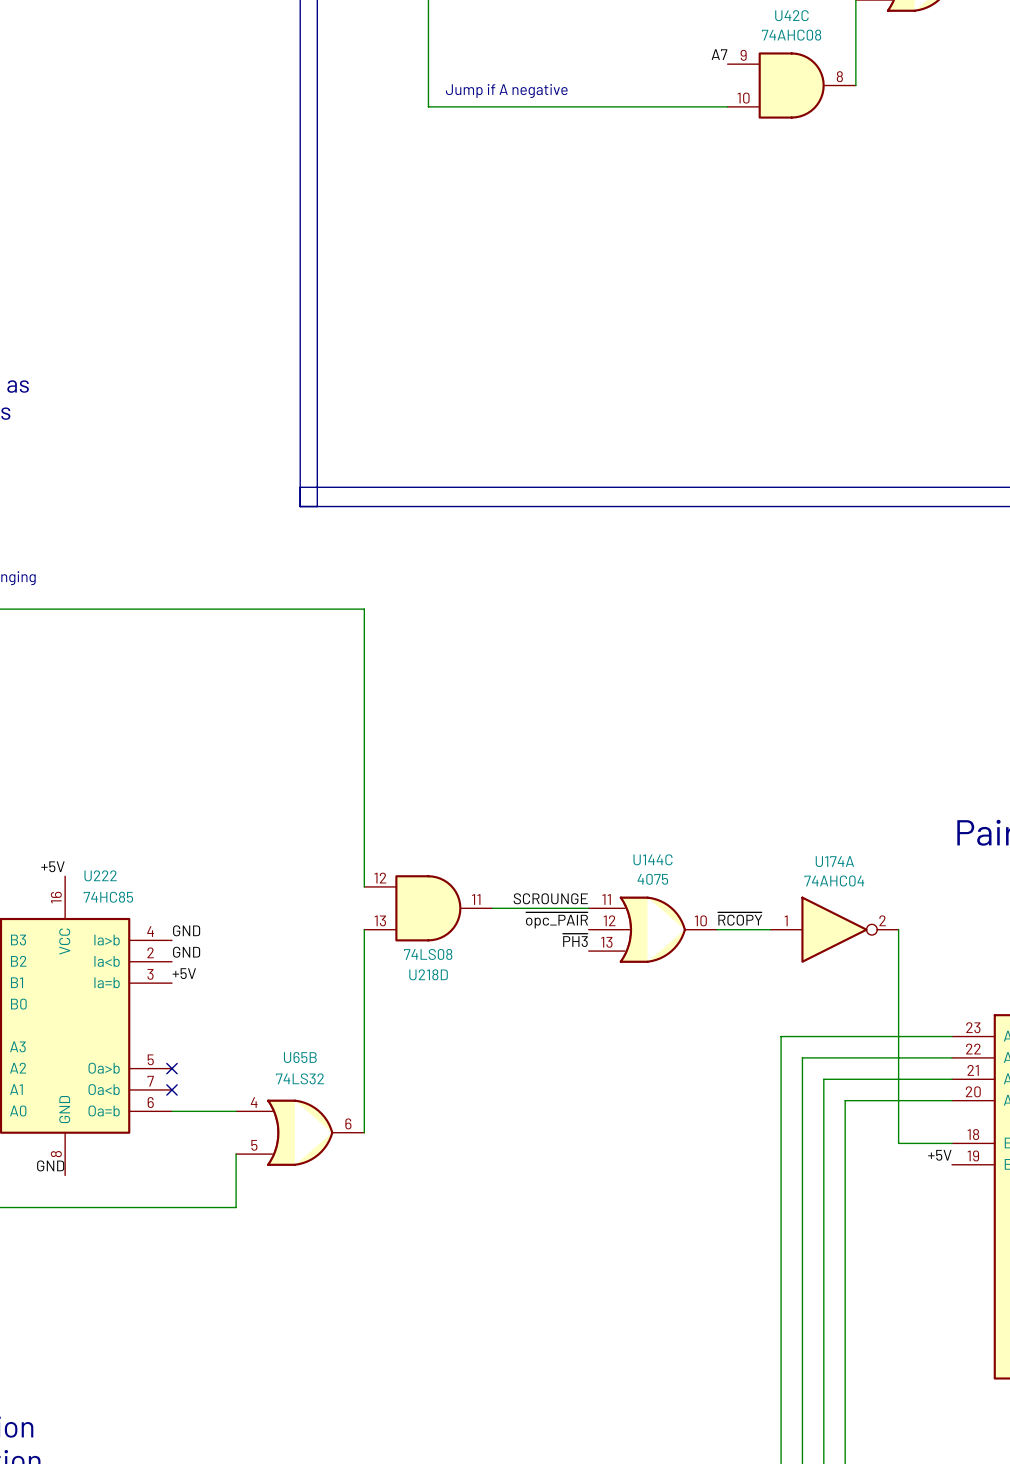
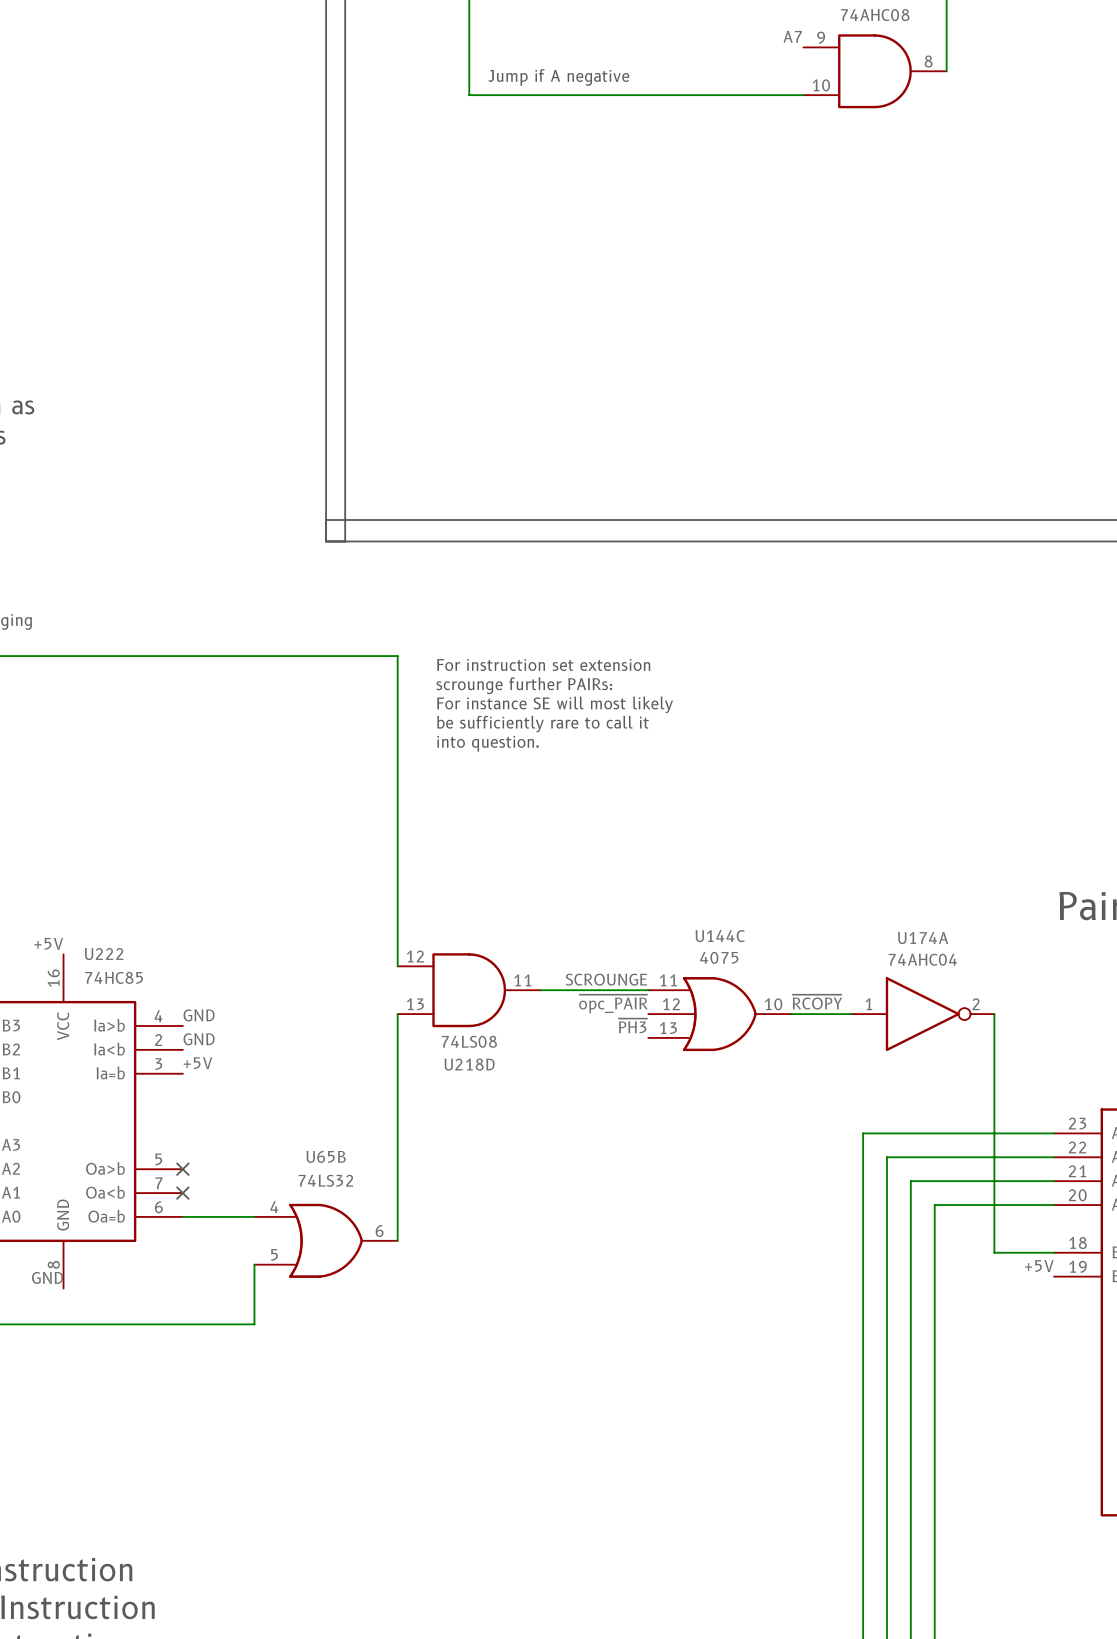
text: none -> For instruction set extension (543, 665)
text: none -> scrounge further PAIRs: (524, 685)
text: none -> For instance SE will most likely (555, 704)
text: none -> be sufficiently rare to call it (543, 724)
text: none -> into question. (488, 743)

